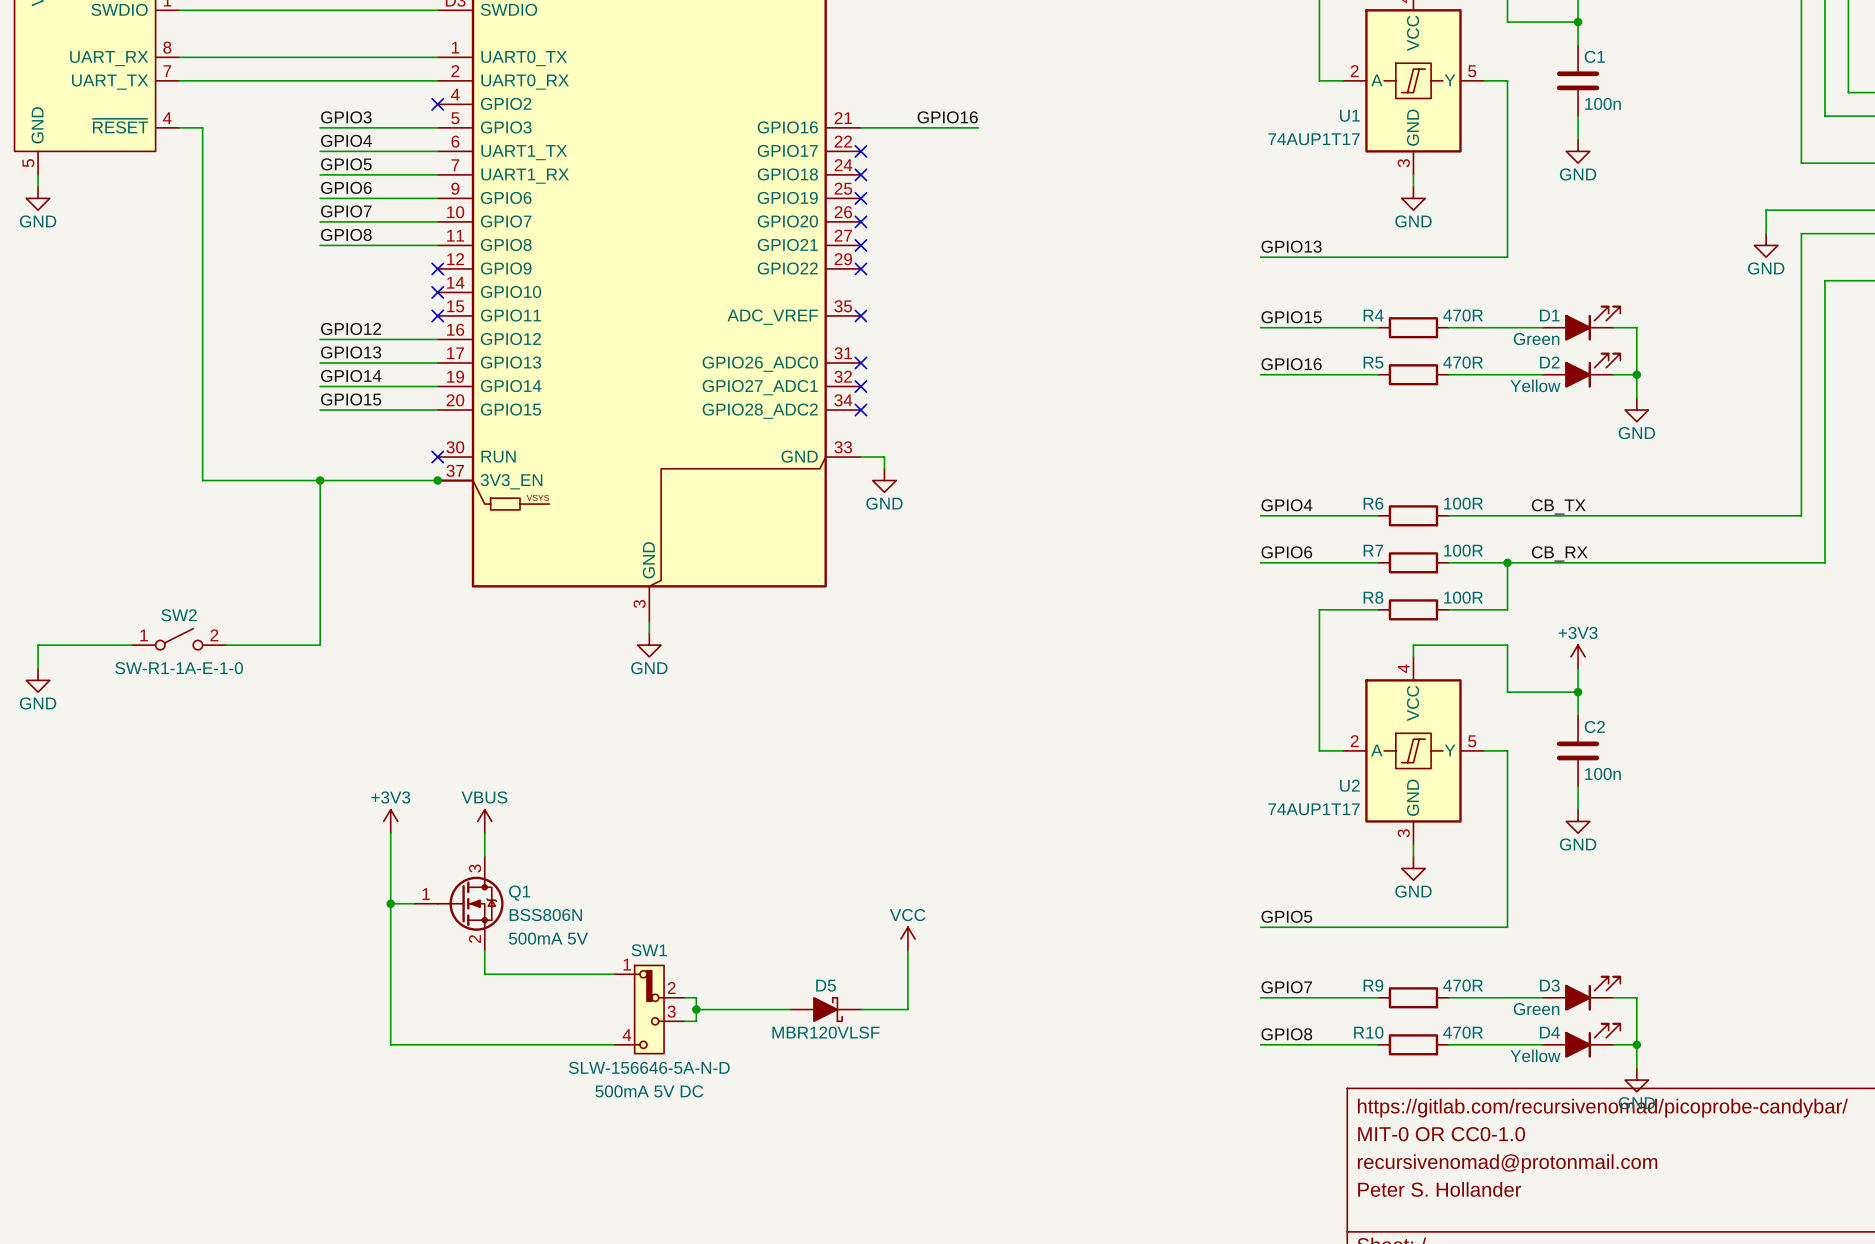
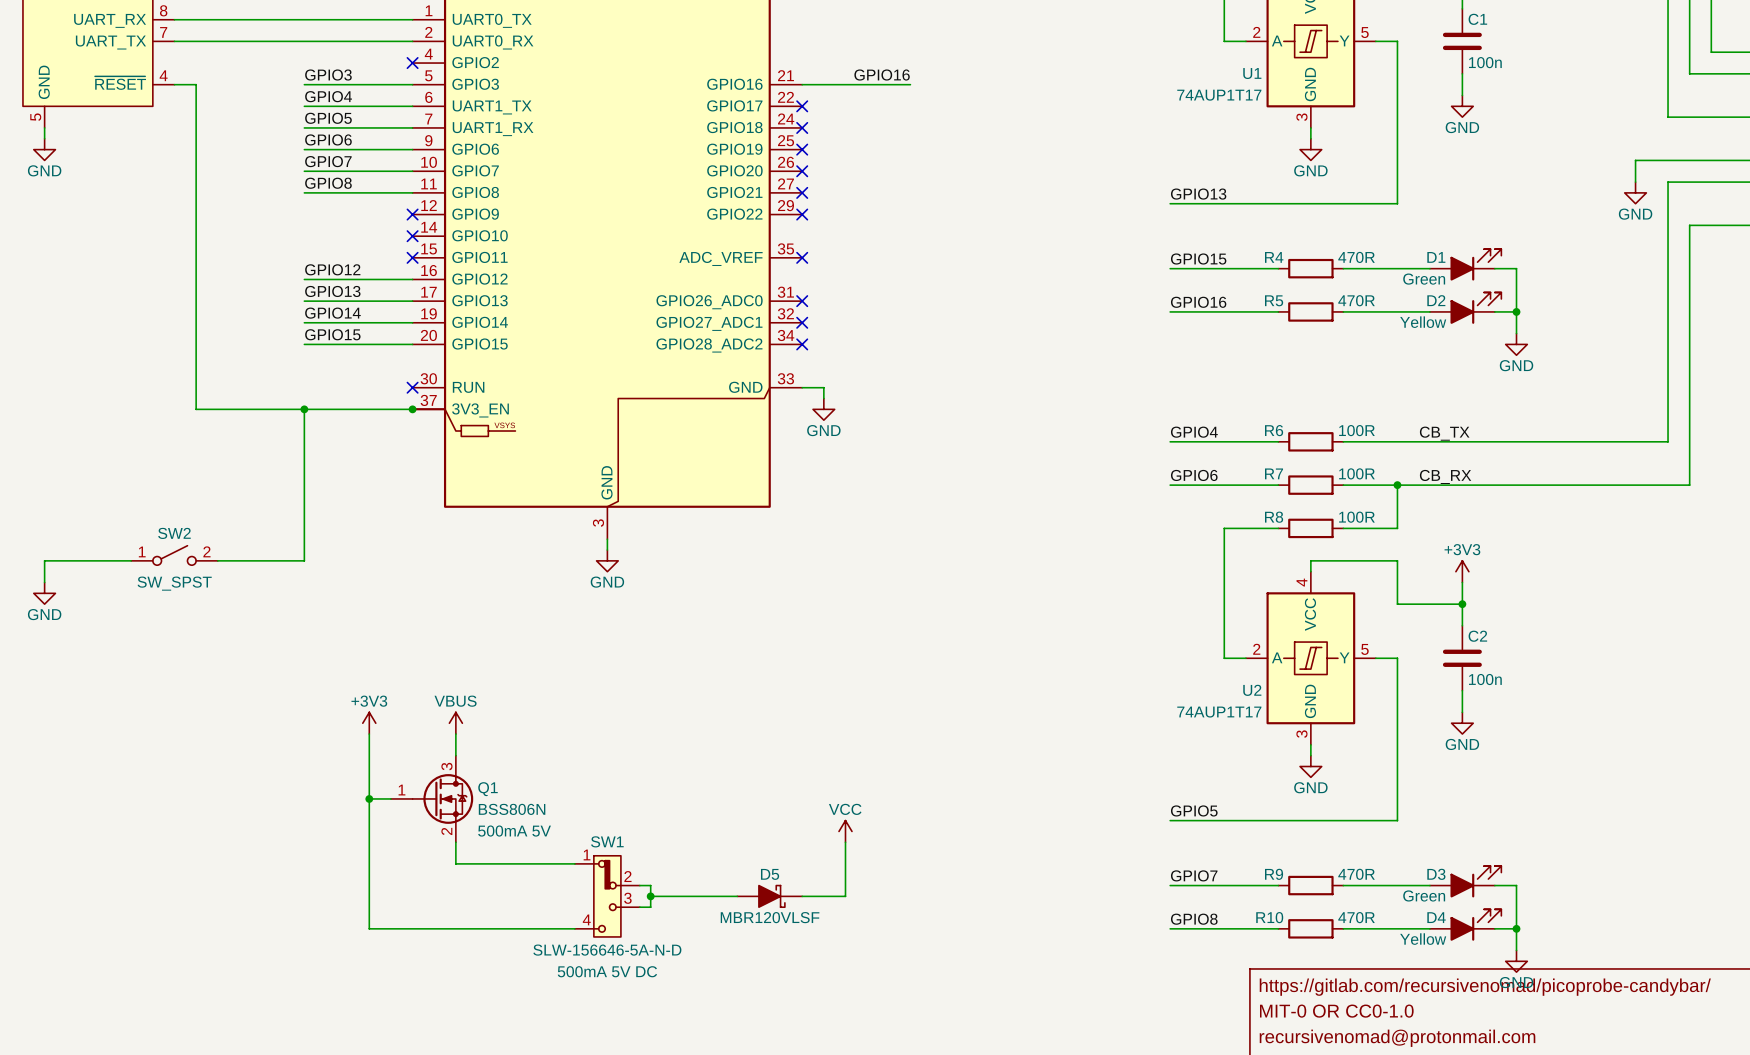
SW2 value: SW-R1-1A-E-1-0 (179, 668) -> SW_SPST (174, 583)

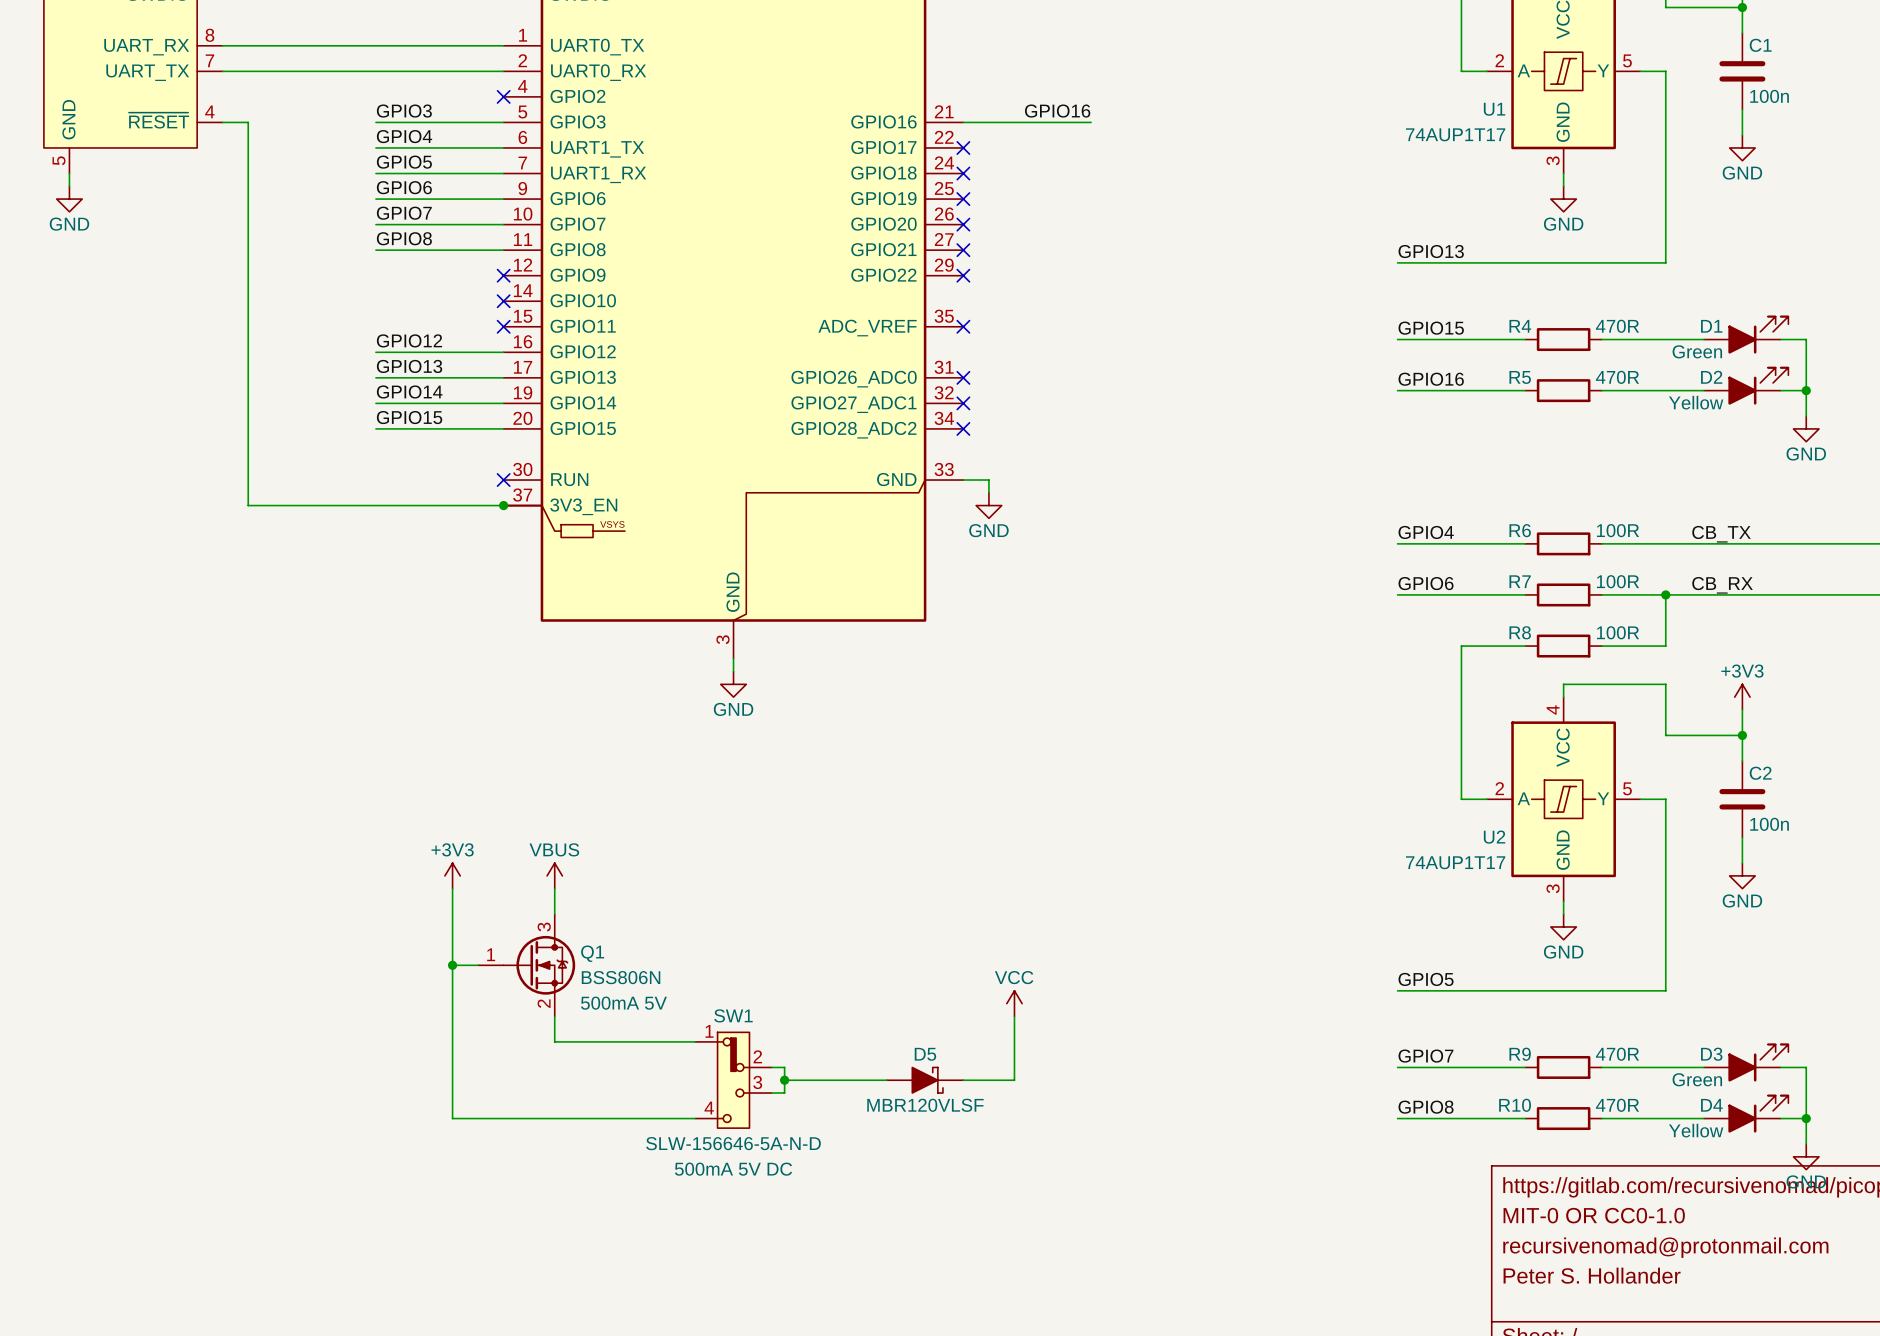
wire: (304, 409) (304, 560) (217, 560) -> none
junction: (304, 409) -> none
SW2: SW_SPST (174, 555) -> none
wire: (131, 560) (44, 560) (44, 582) -> none
power symbol: GND (44, 593) -> none

